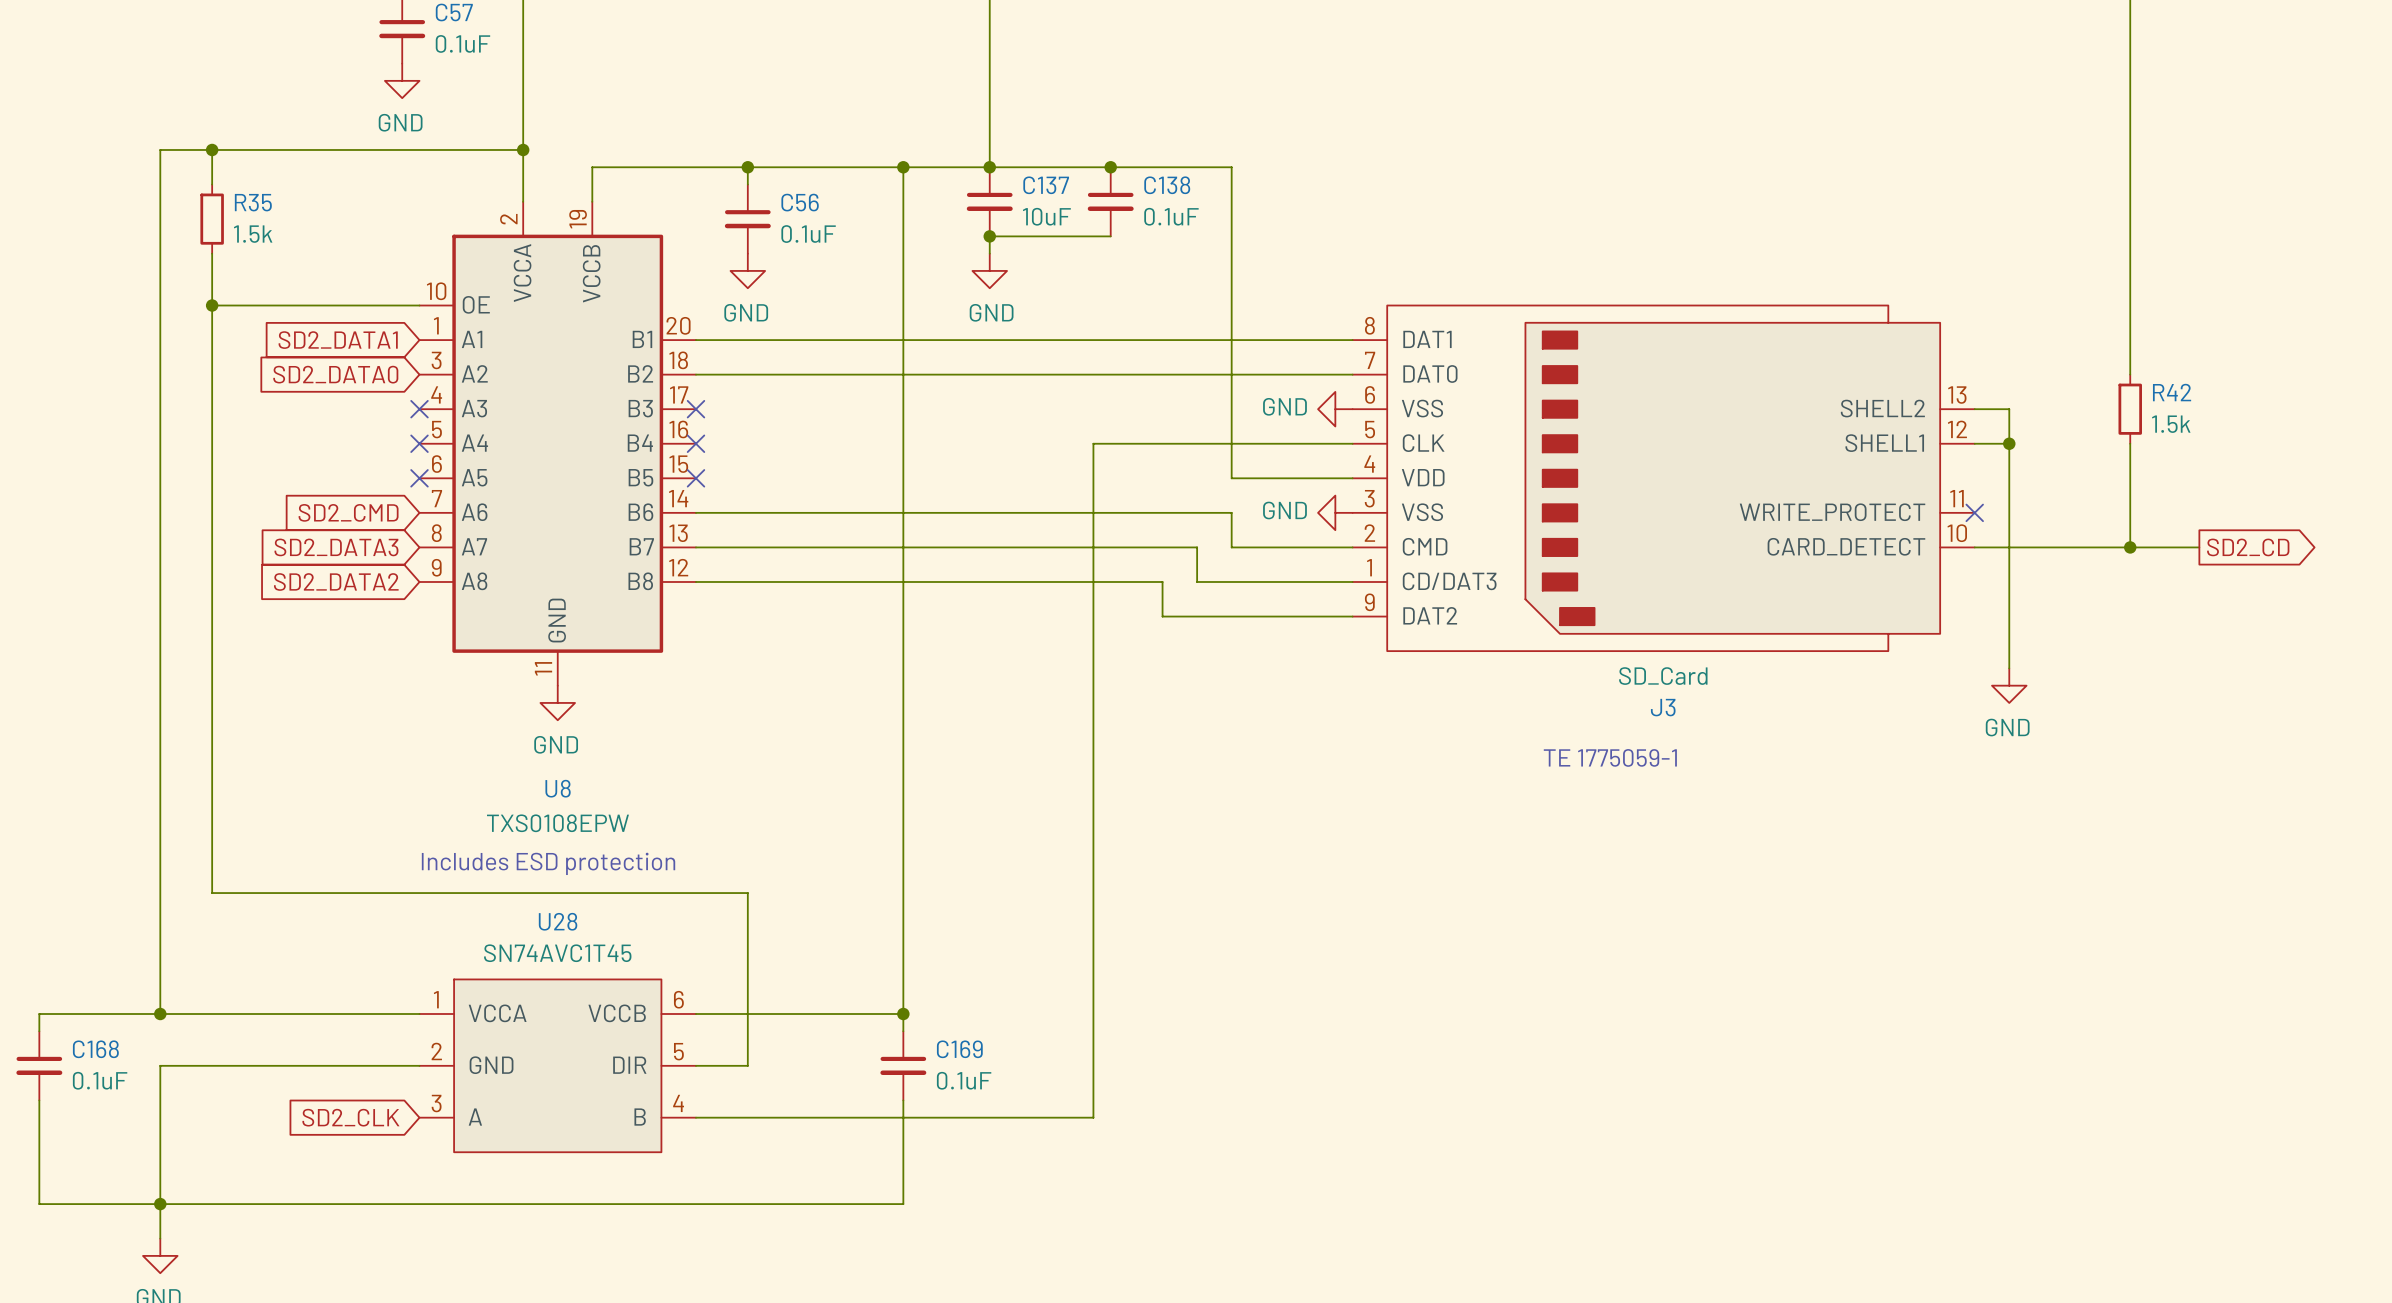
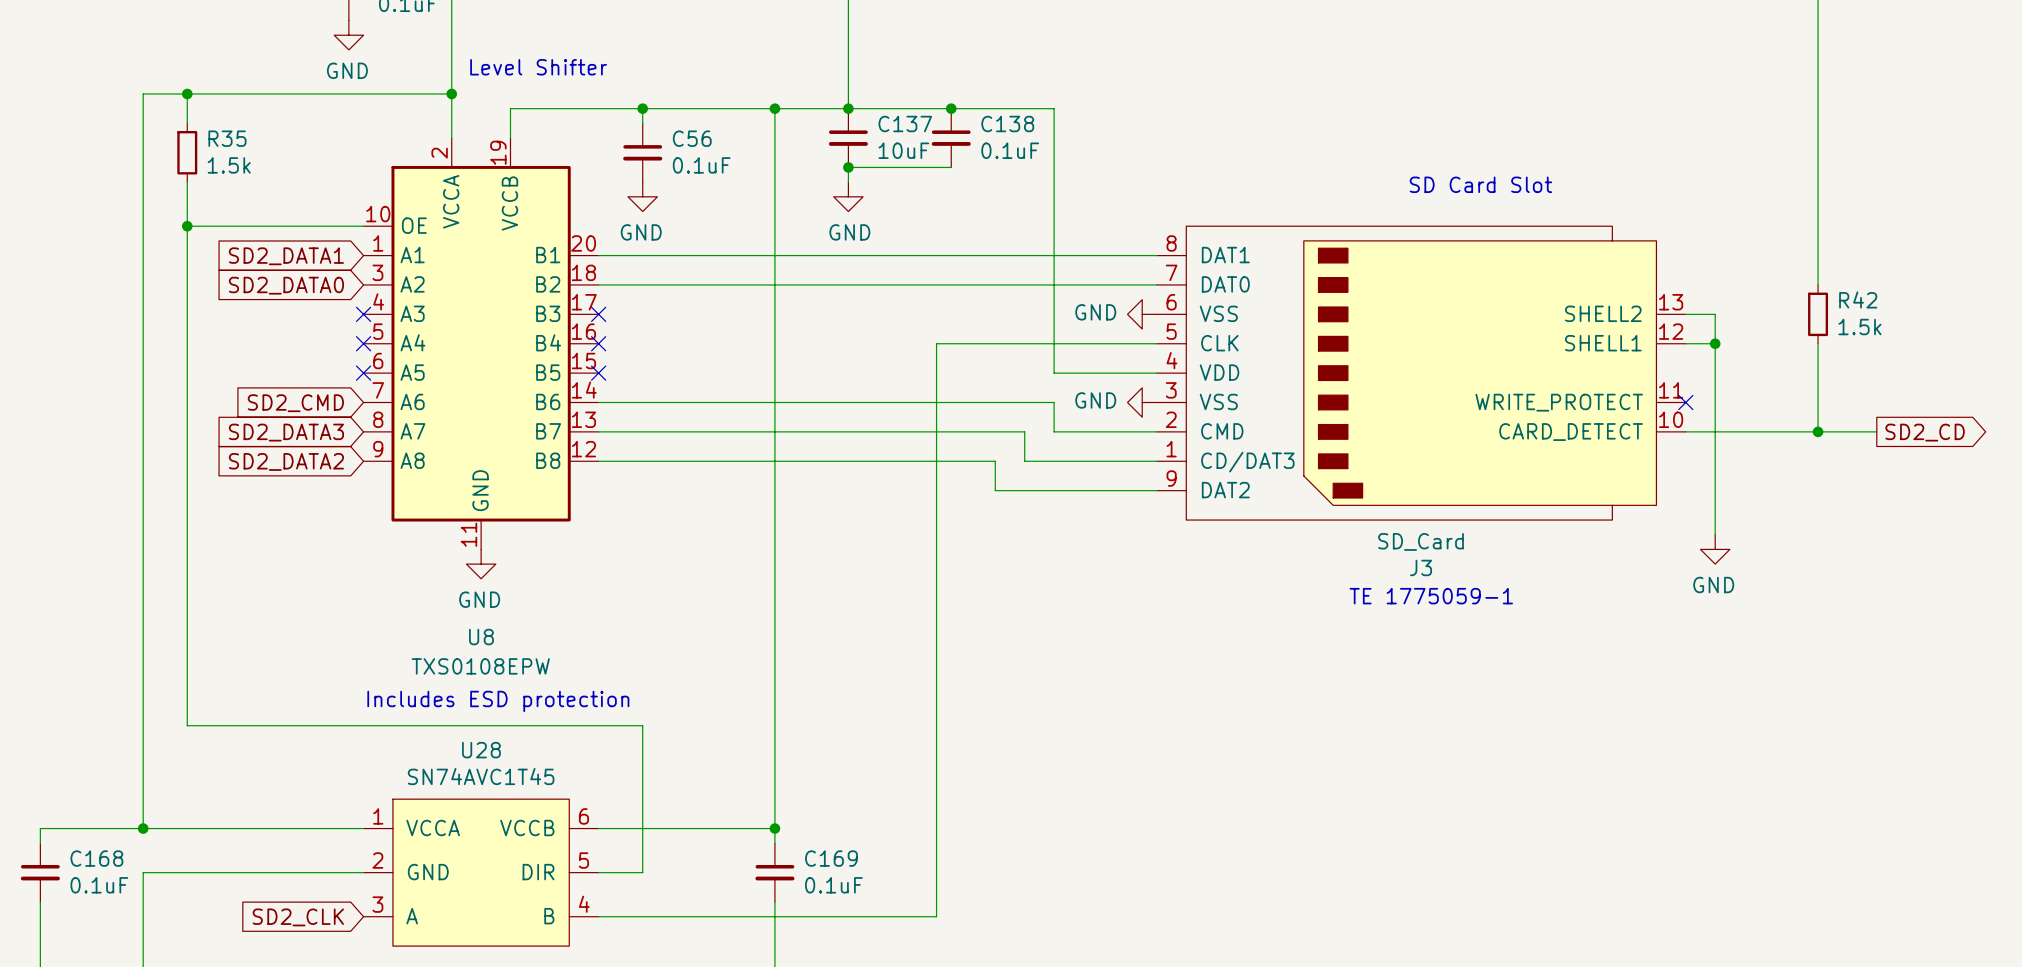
text: none -> Level Shifter (538, 67)
text: none -> SD Card Slot (1480, 184)
text position: TE 1775059-1 (1610, 757) -> TE 1775059-1 (1431, 596)

